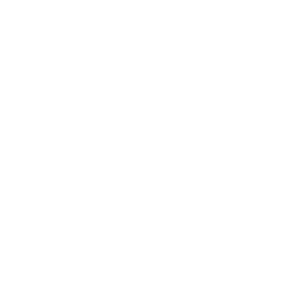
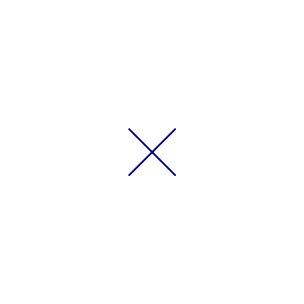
no-connect mark: none -> (152, 152)

